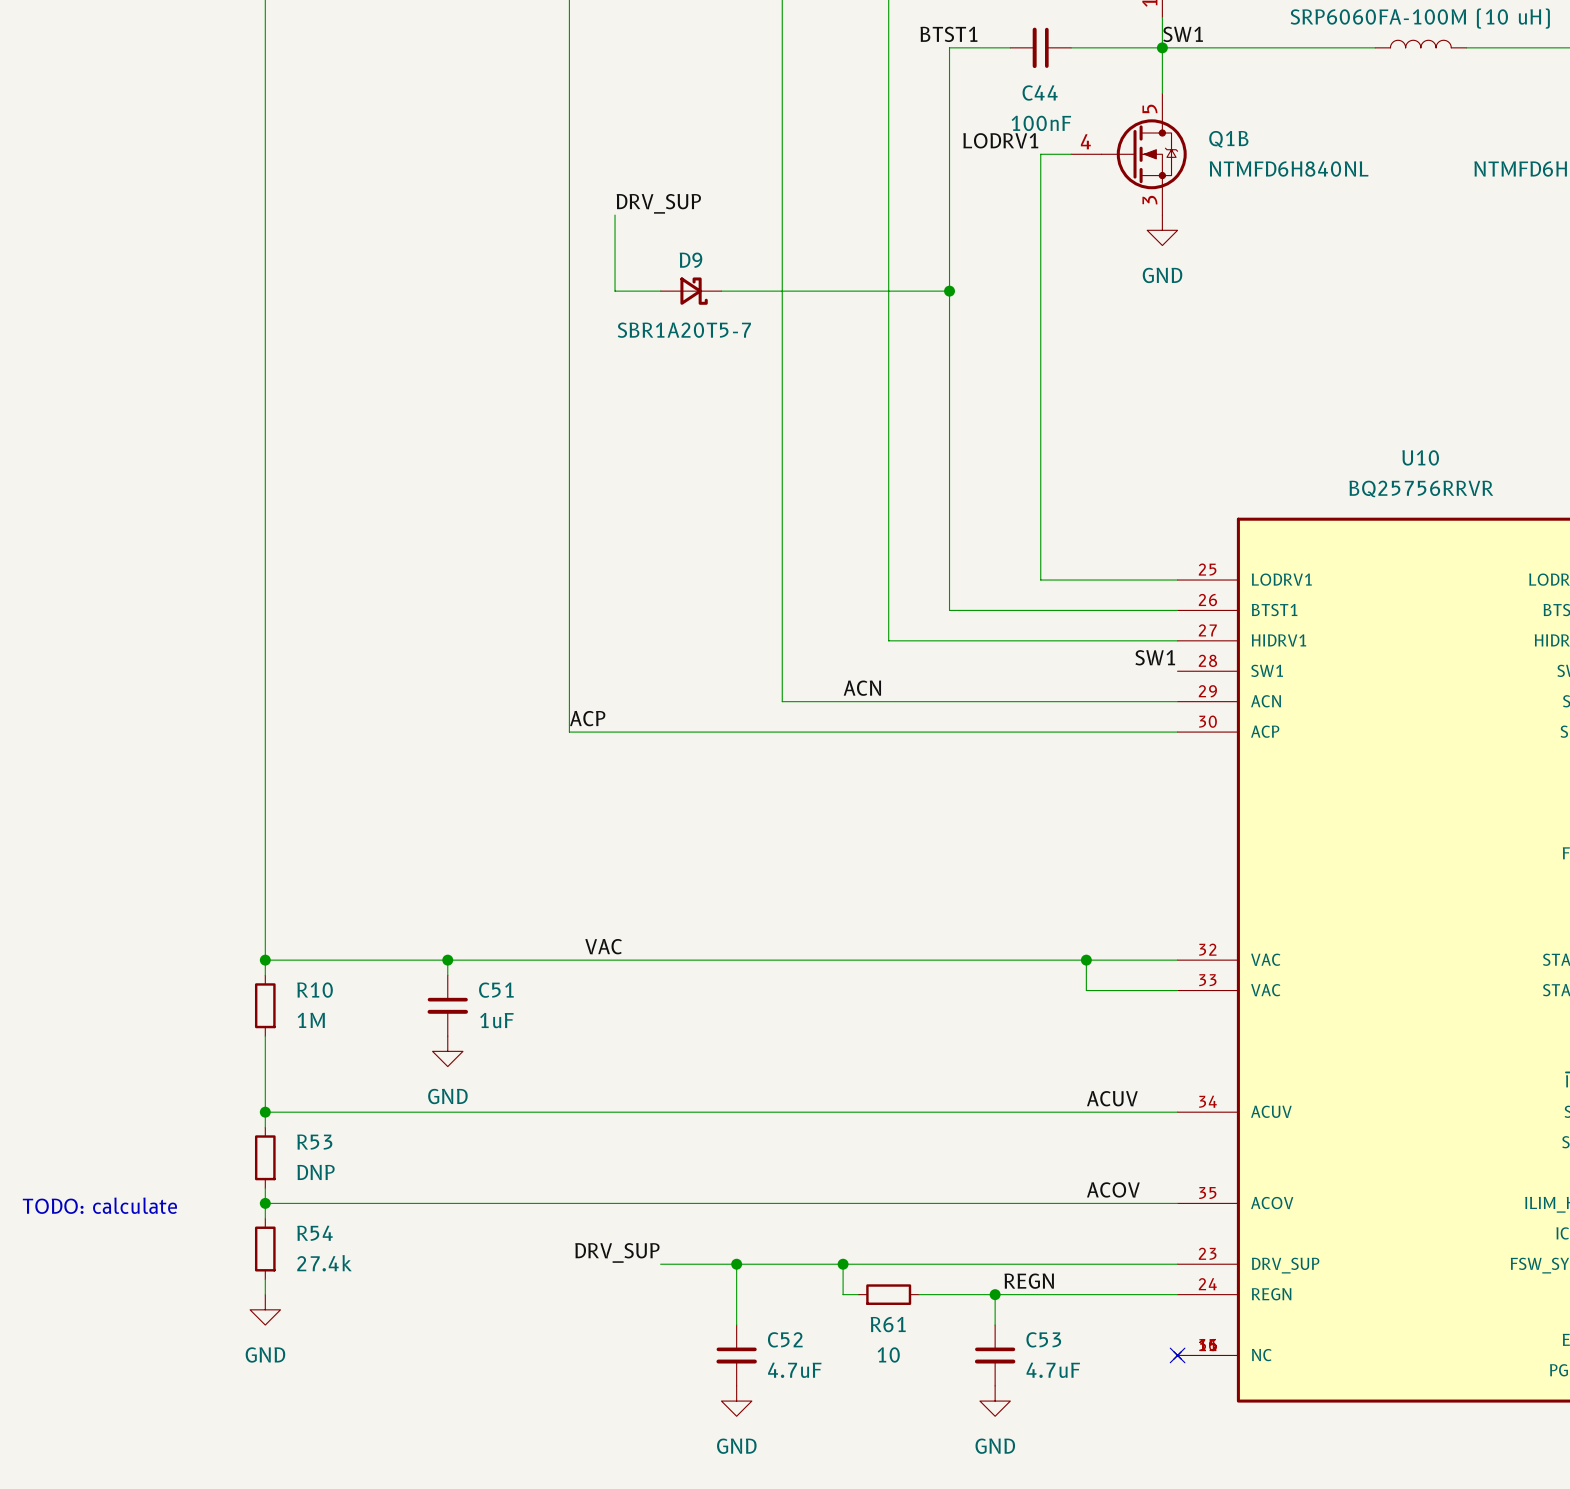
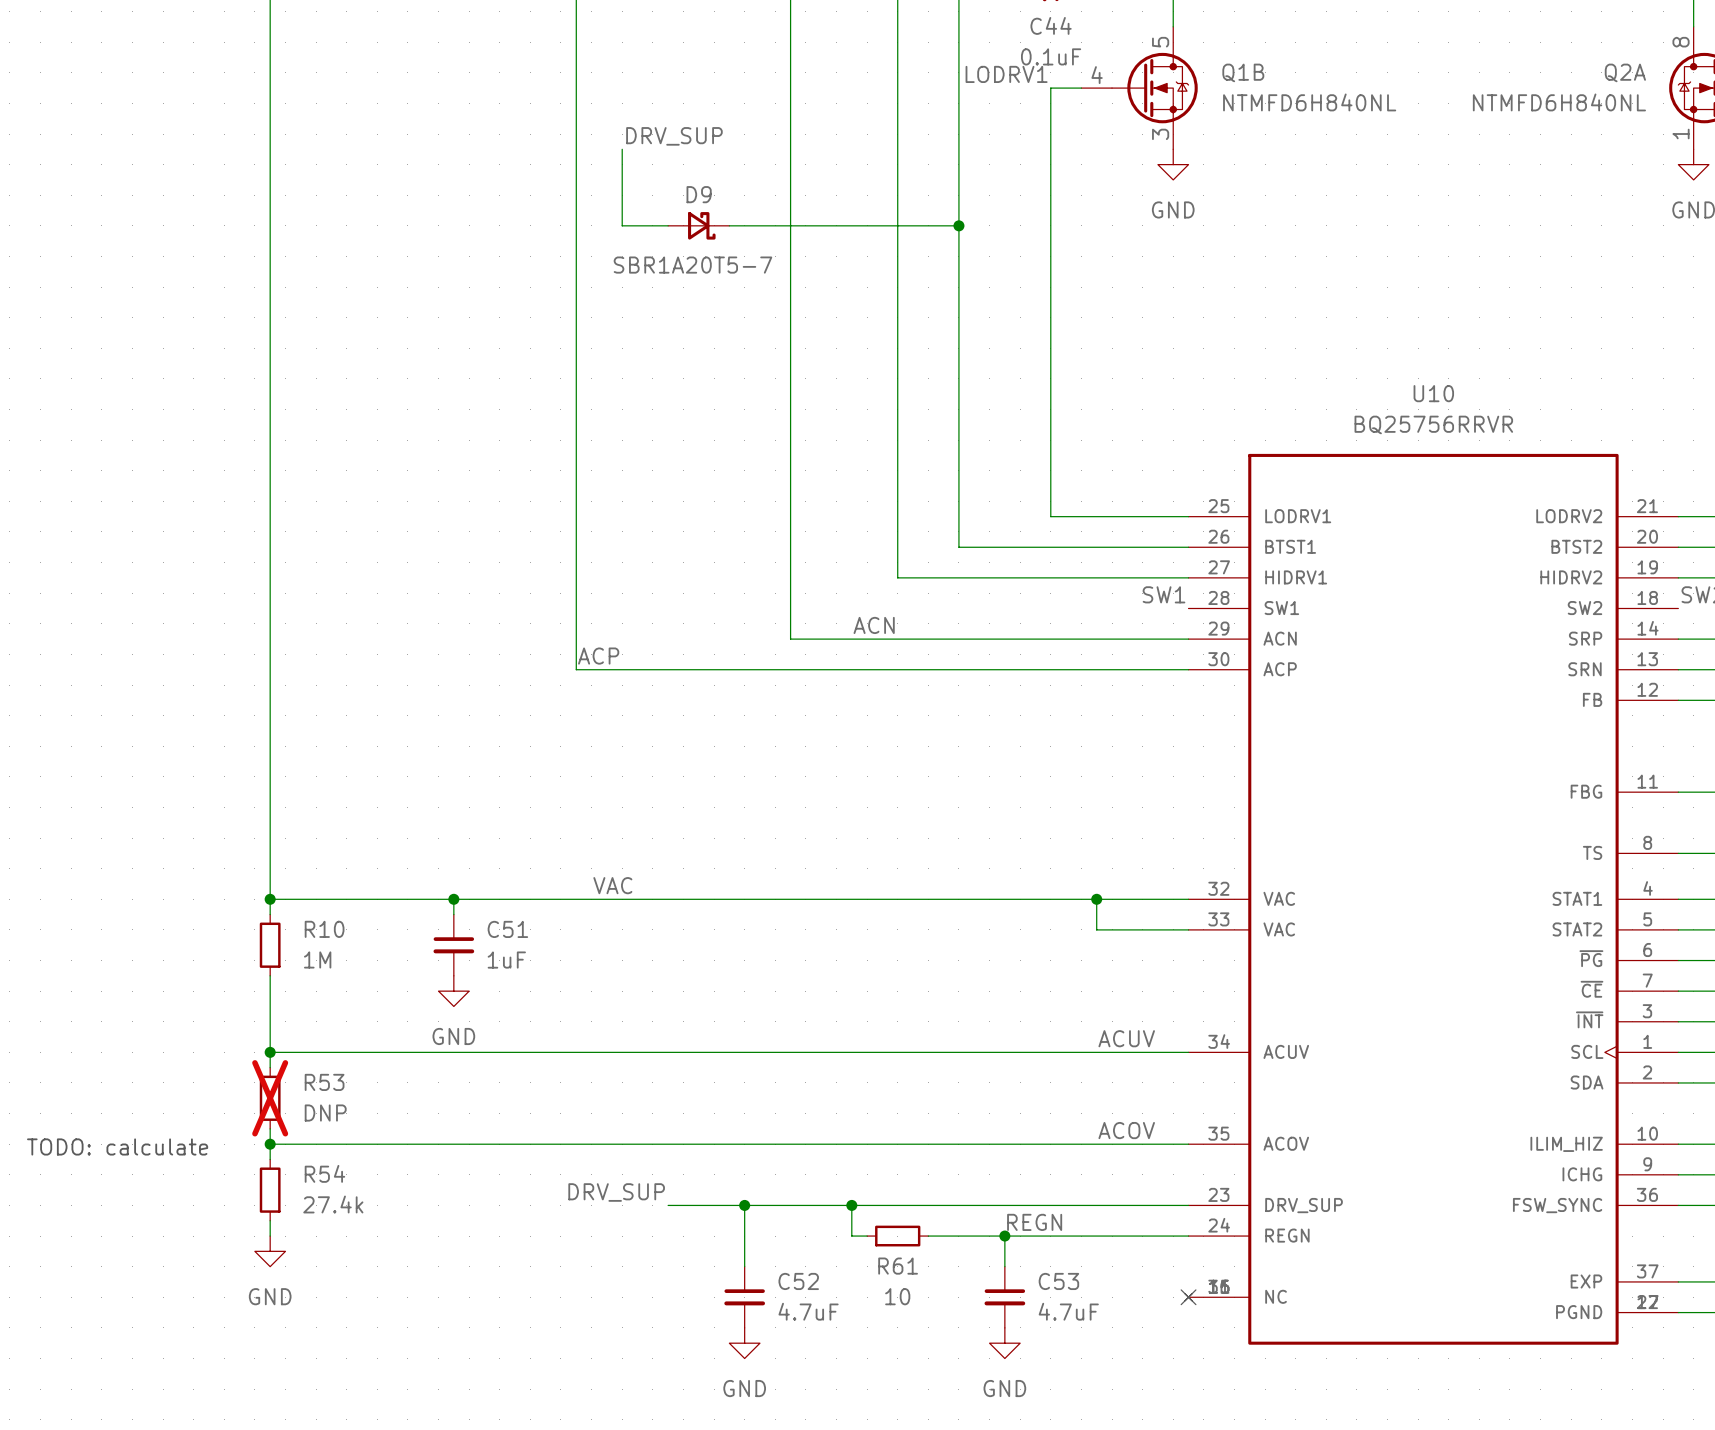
C44 value: 100nF (1041, 123) -> 0.1uF (1051, 56)
R53 do-not-place cross: none -> (270, 1098)

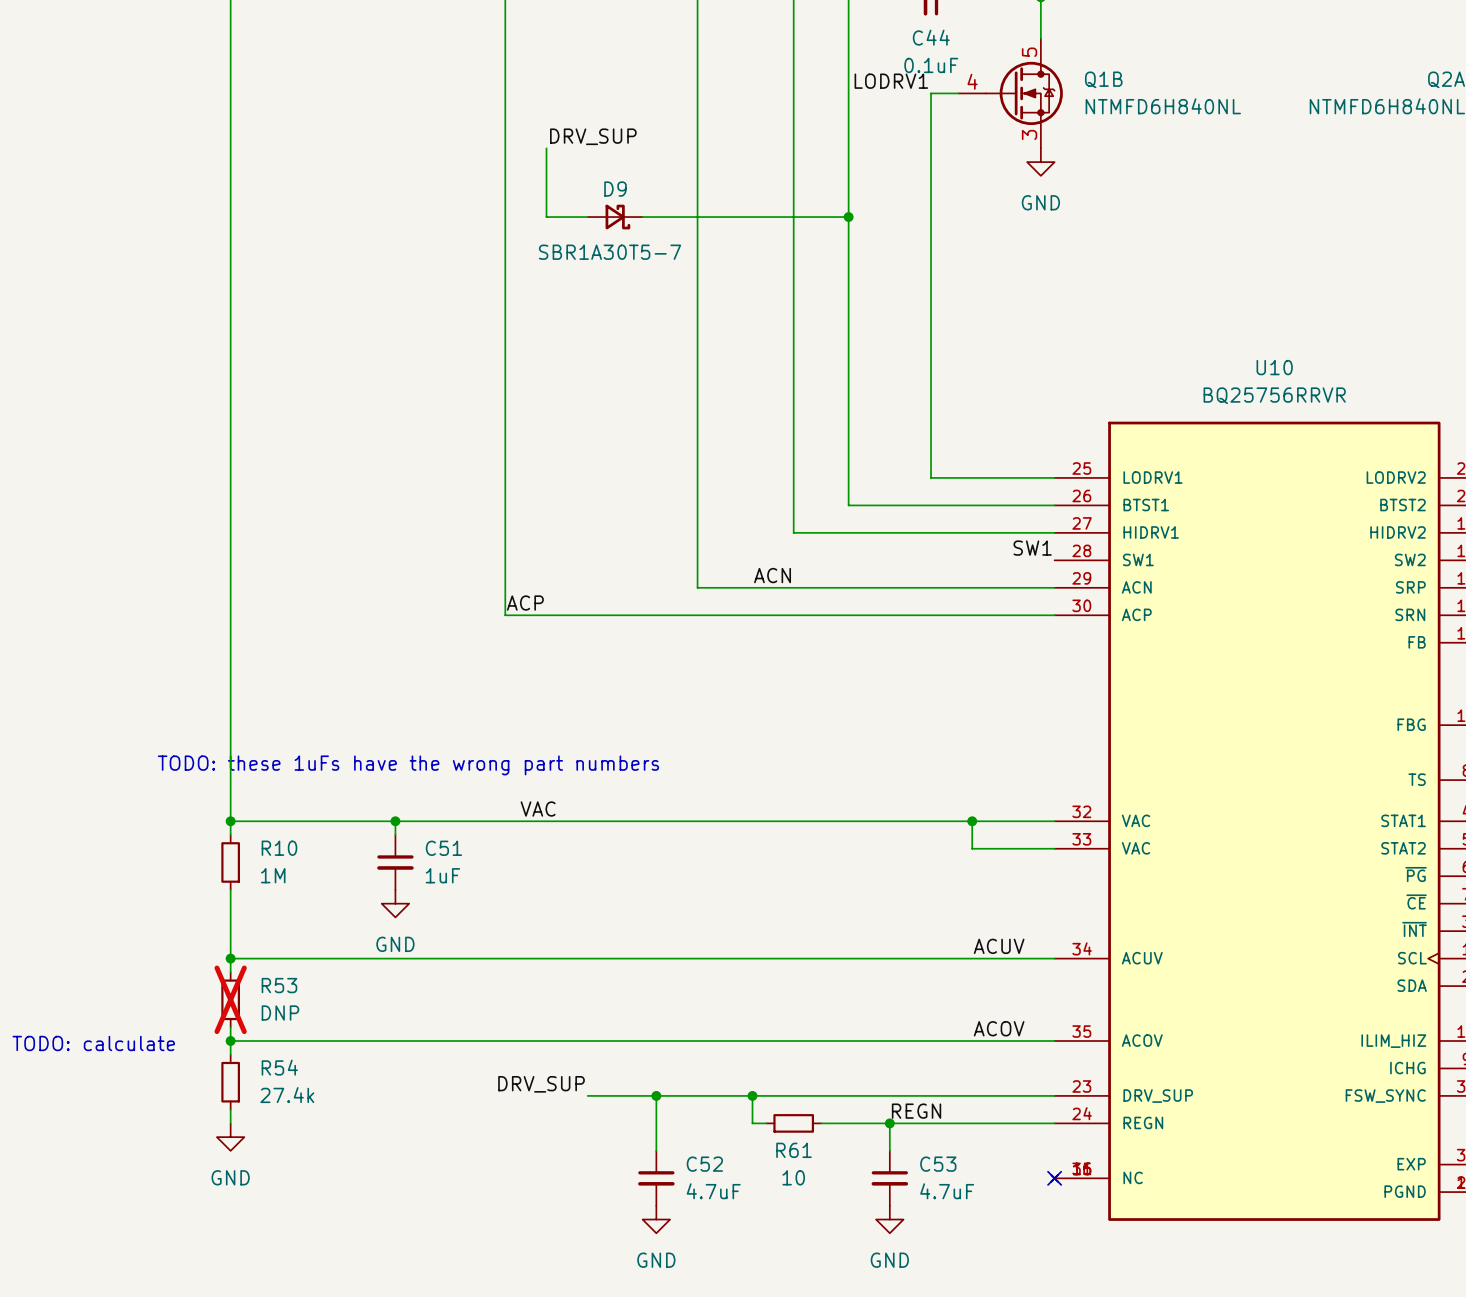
D9 value: SBR1A20T5-7 (692, 265) -> SBR1A30T5-7 (609, 252)
text: none -> TODO: these 1uFs have the wrong part numbers (408, 765)

